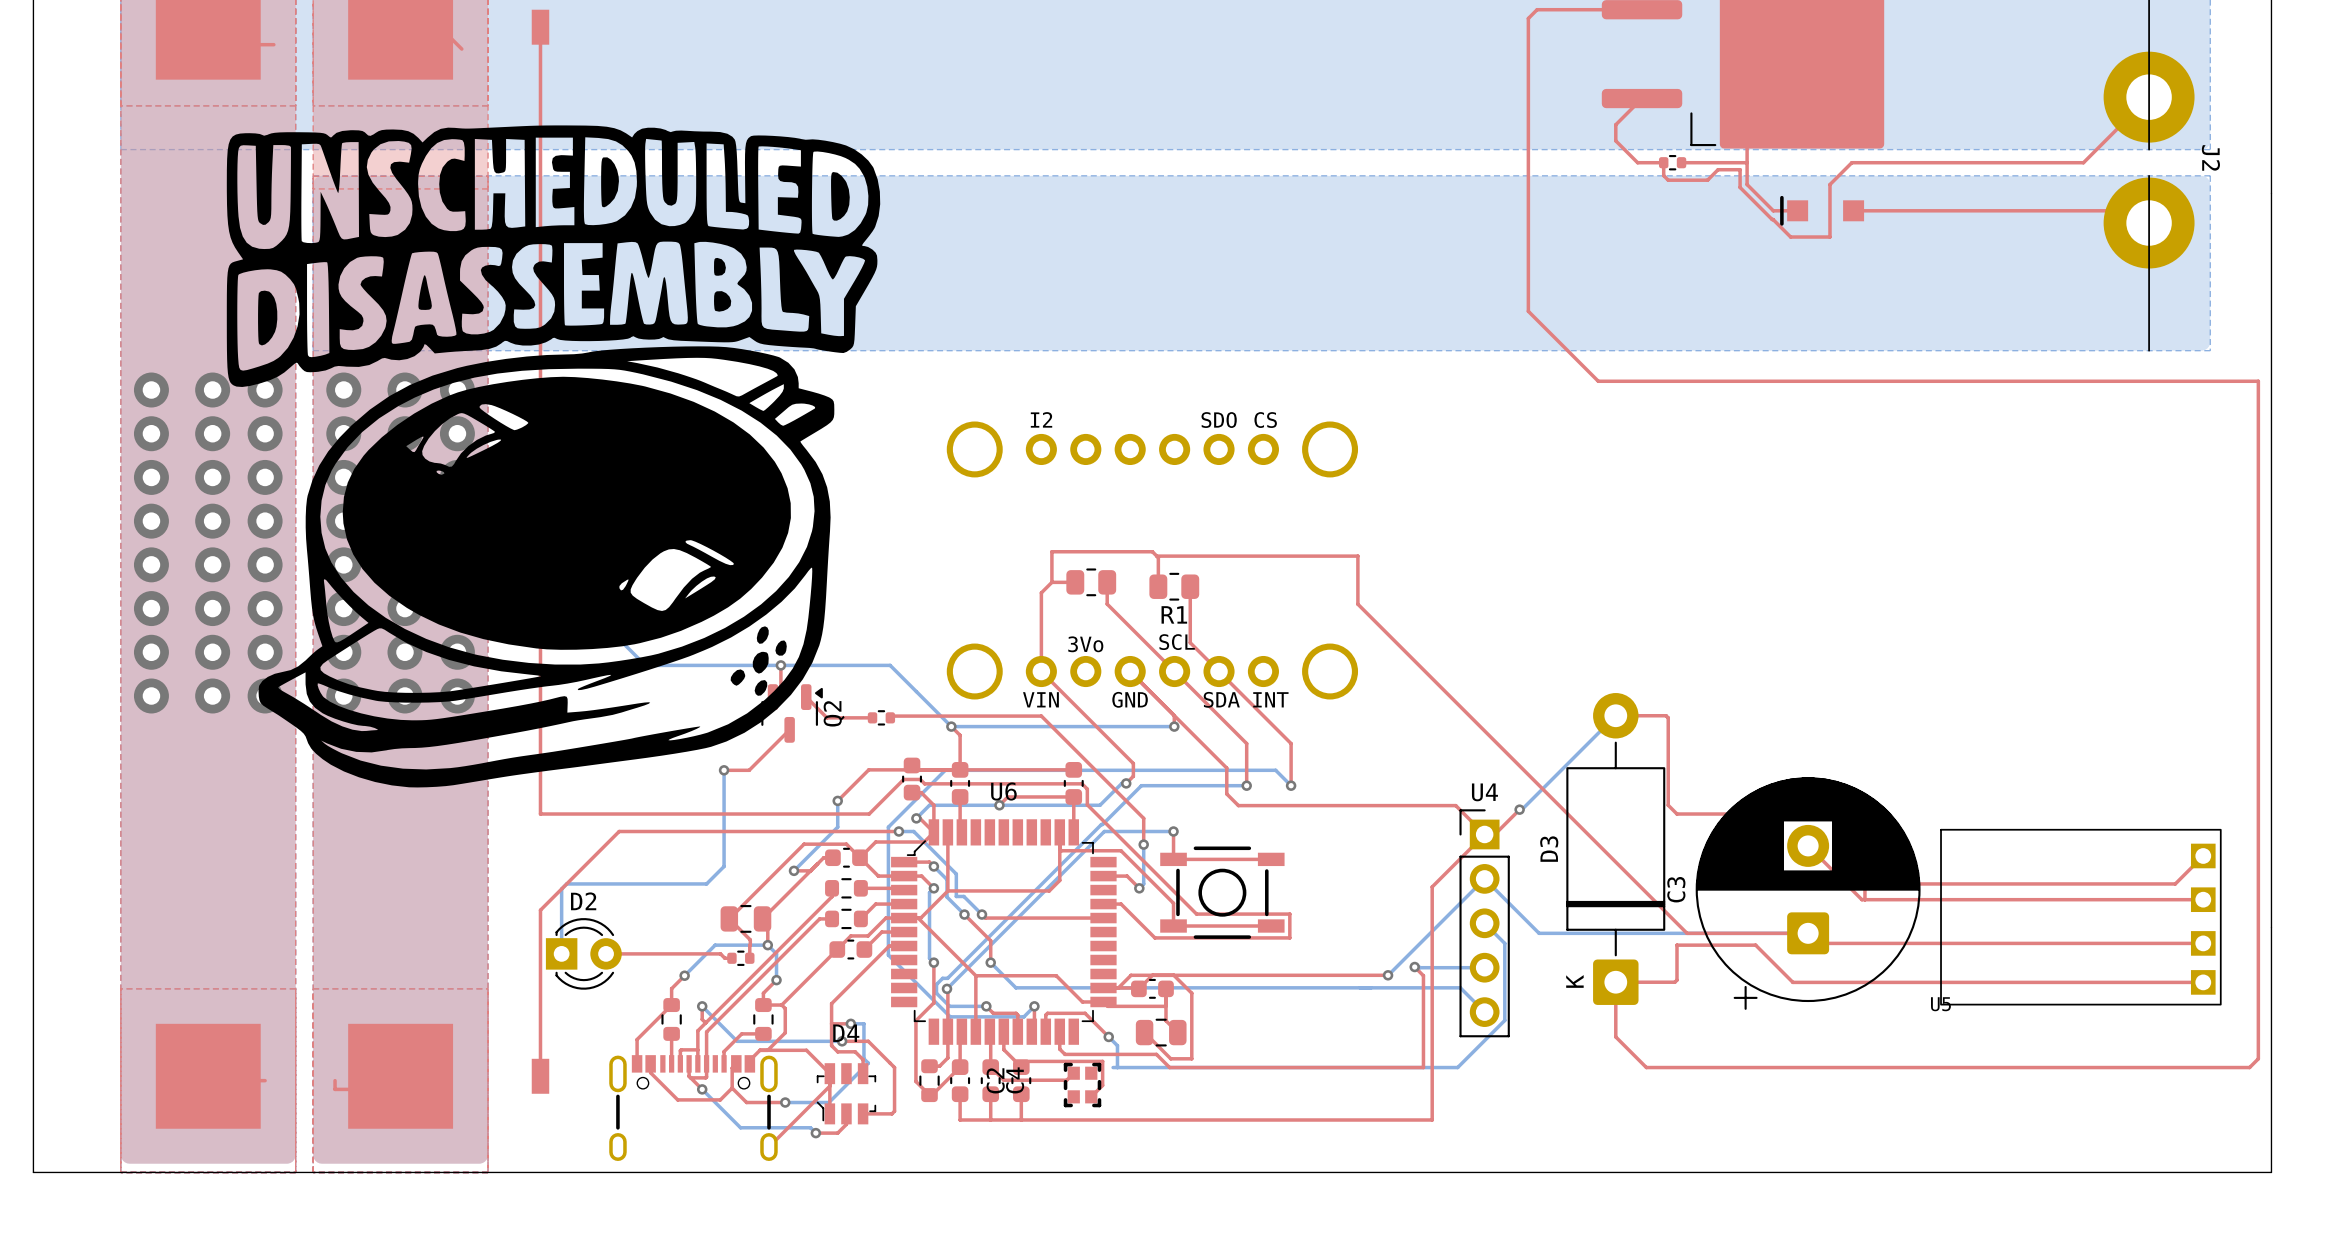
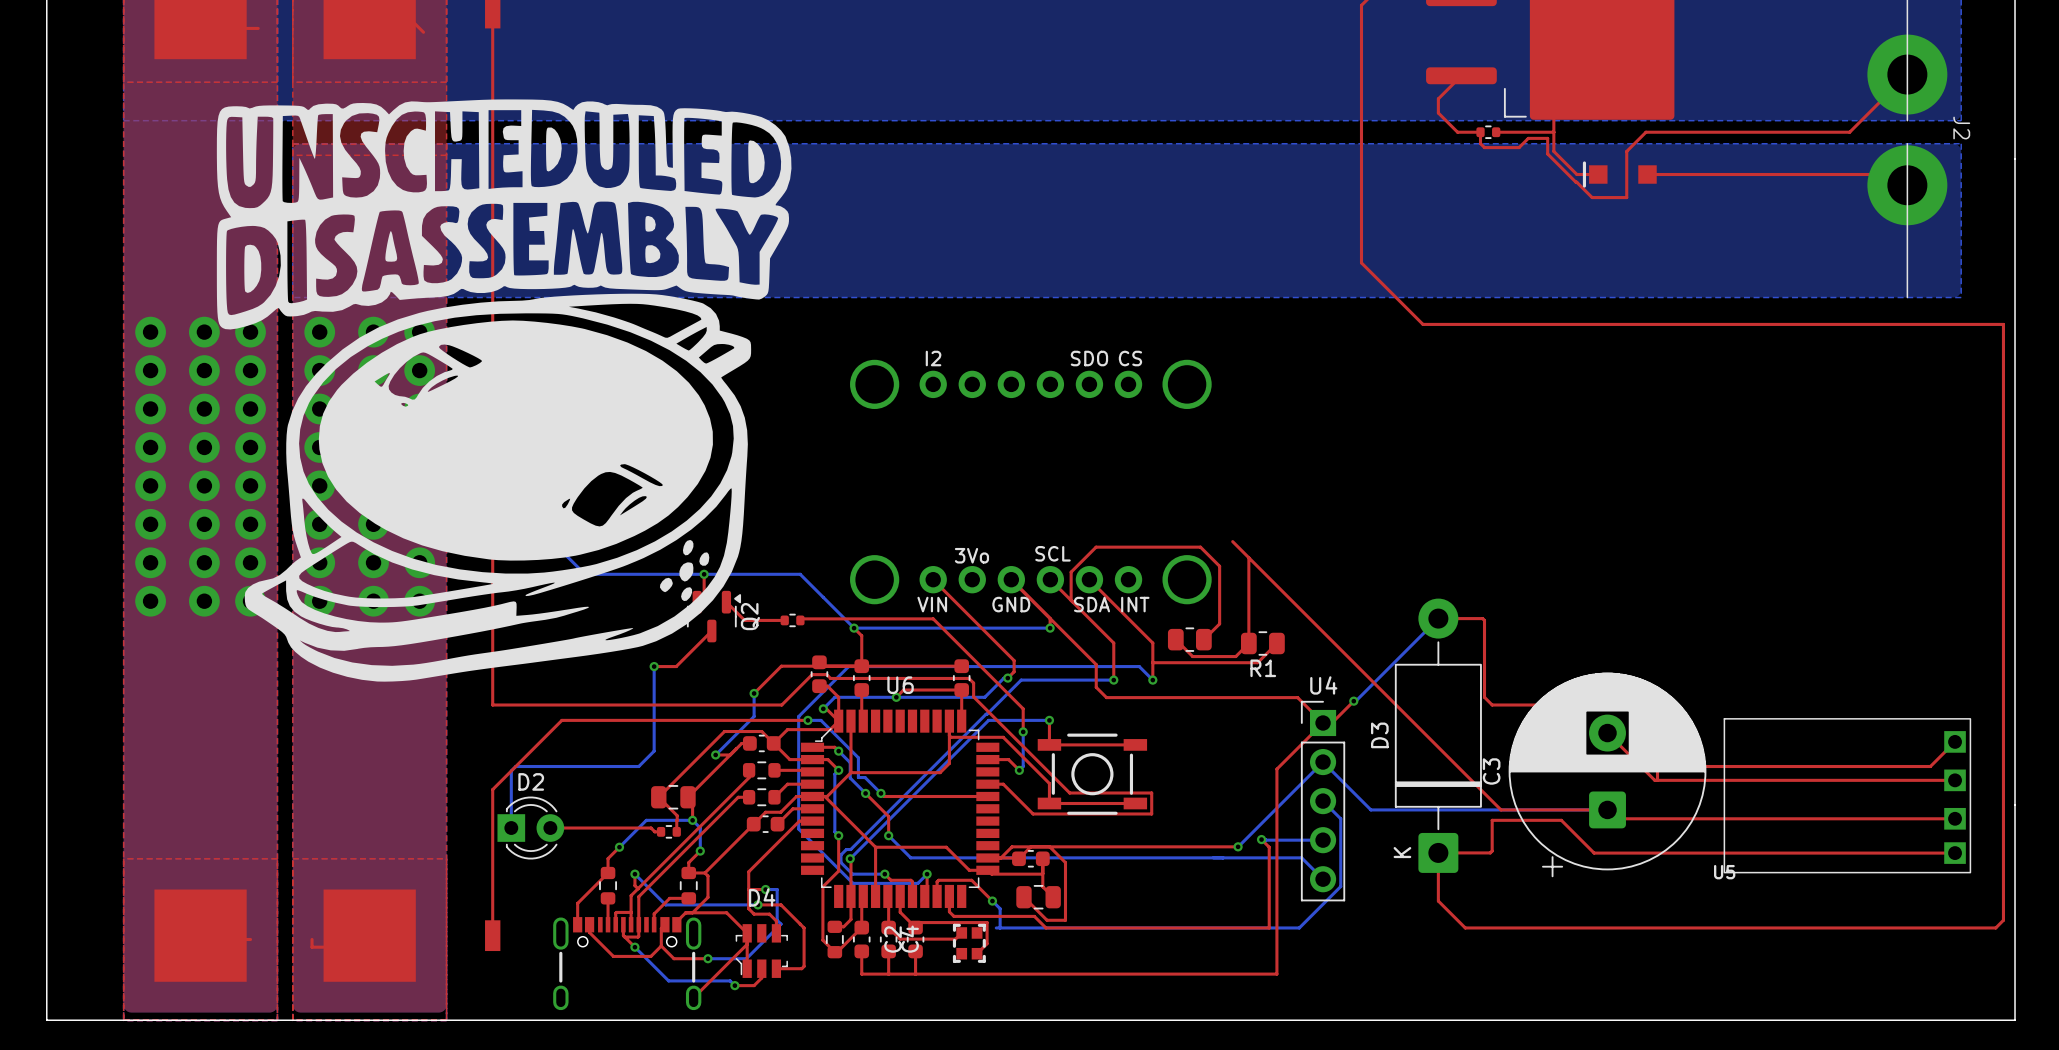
top track: (1156, 556) (1357, 556) (1357, 604) (1381, 628) -> none
top track: (1051, 582) (1051, 551) (1152, 551) (1158, 557) (1158, 586) -> none
top track: (1051, 582) (1075, 582) -> none
top track: (1051, 582) (1041, 592) (1041, 671) -> none
part position: (1091, 582) -> (1189, 639)
top track: (1107, 582) (1107, 604) (1174, 671) -> none
R1 position: (1174, 586) -> (1262, 643)
top track: (1190, 586) (1190, 642) (1219, 671) -> none
top track: none -> (1248, 557) (1248, 643) (1235, 656) (1192, 656) (1175, 639)
top track: none -> (1071, 600) (1071, 572) (1096, 547) (1200, 547) (1219, 566) (1219, 623) (1203, 639)
top track: none -> (1276, 643) (1257, 662) (1152, 662)

